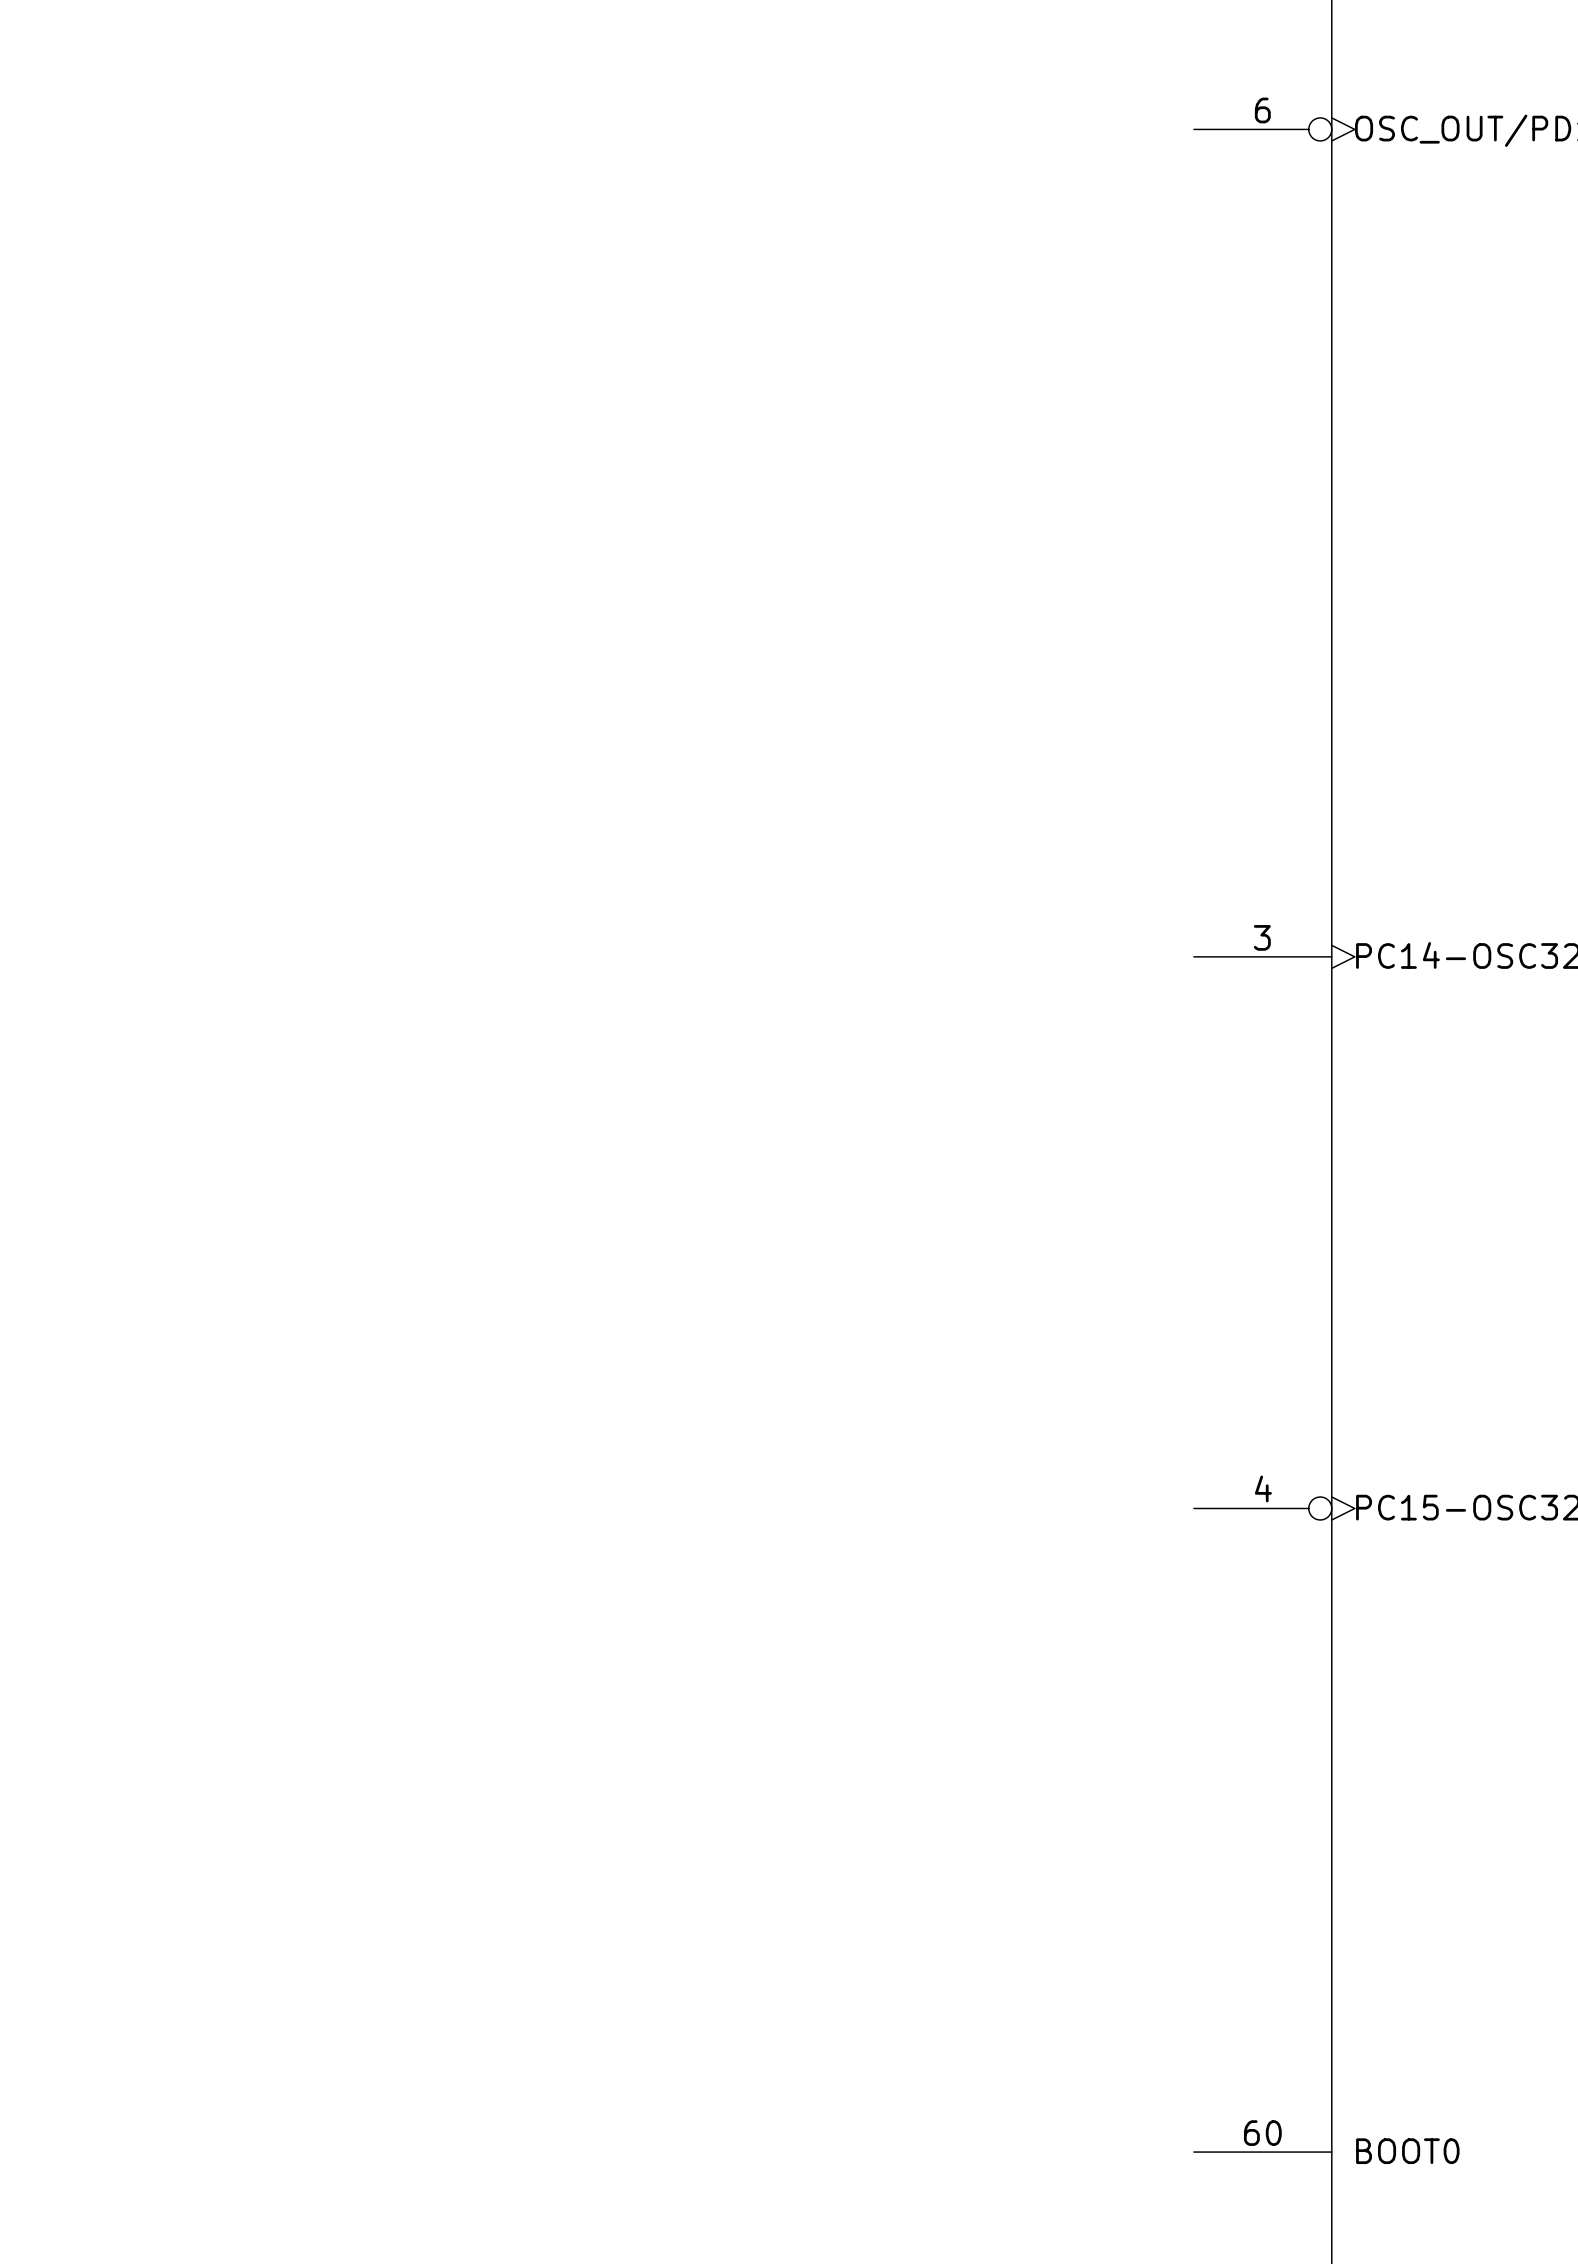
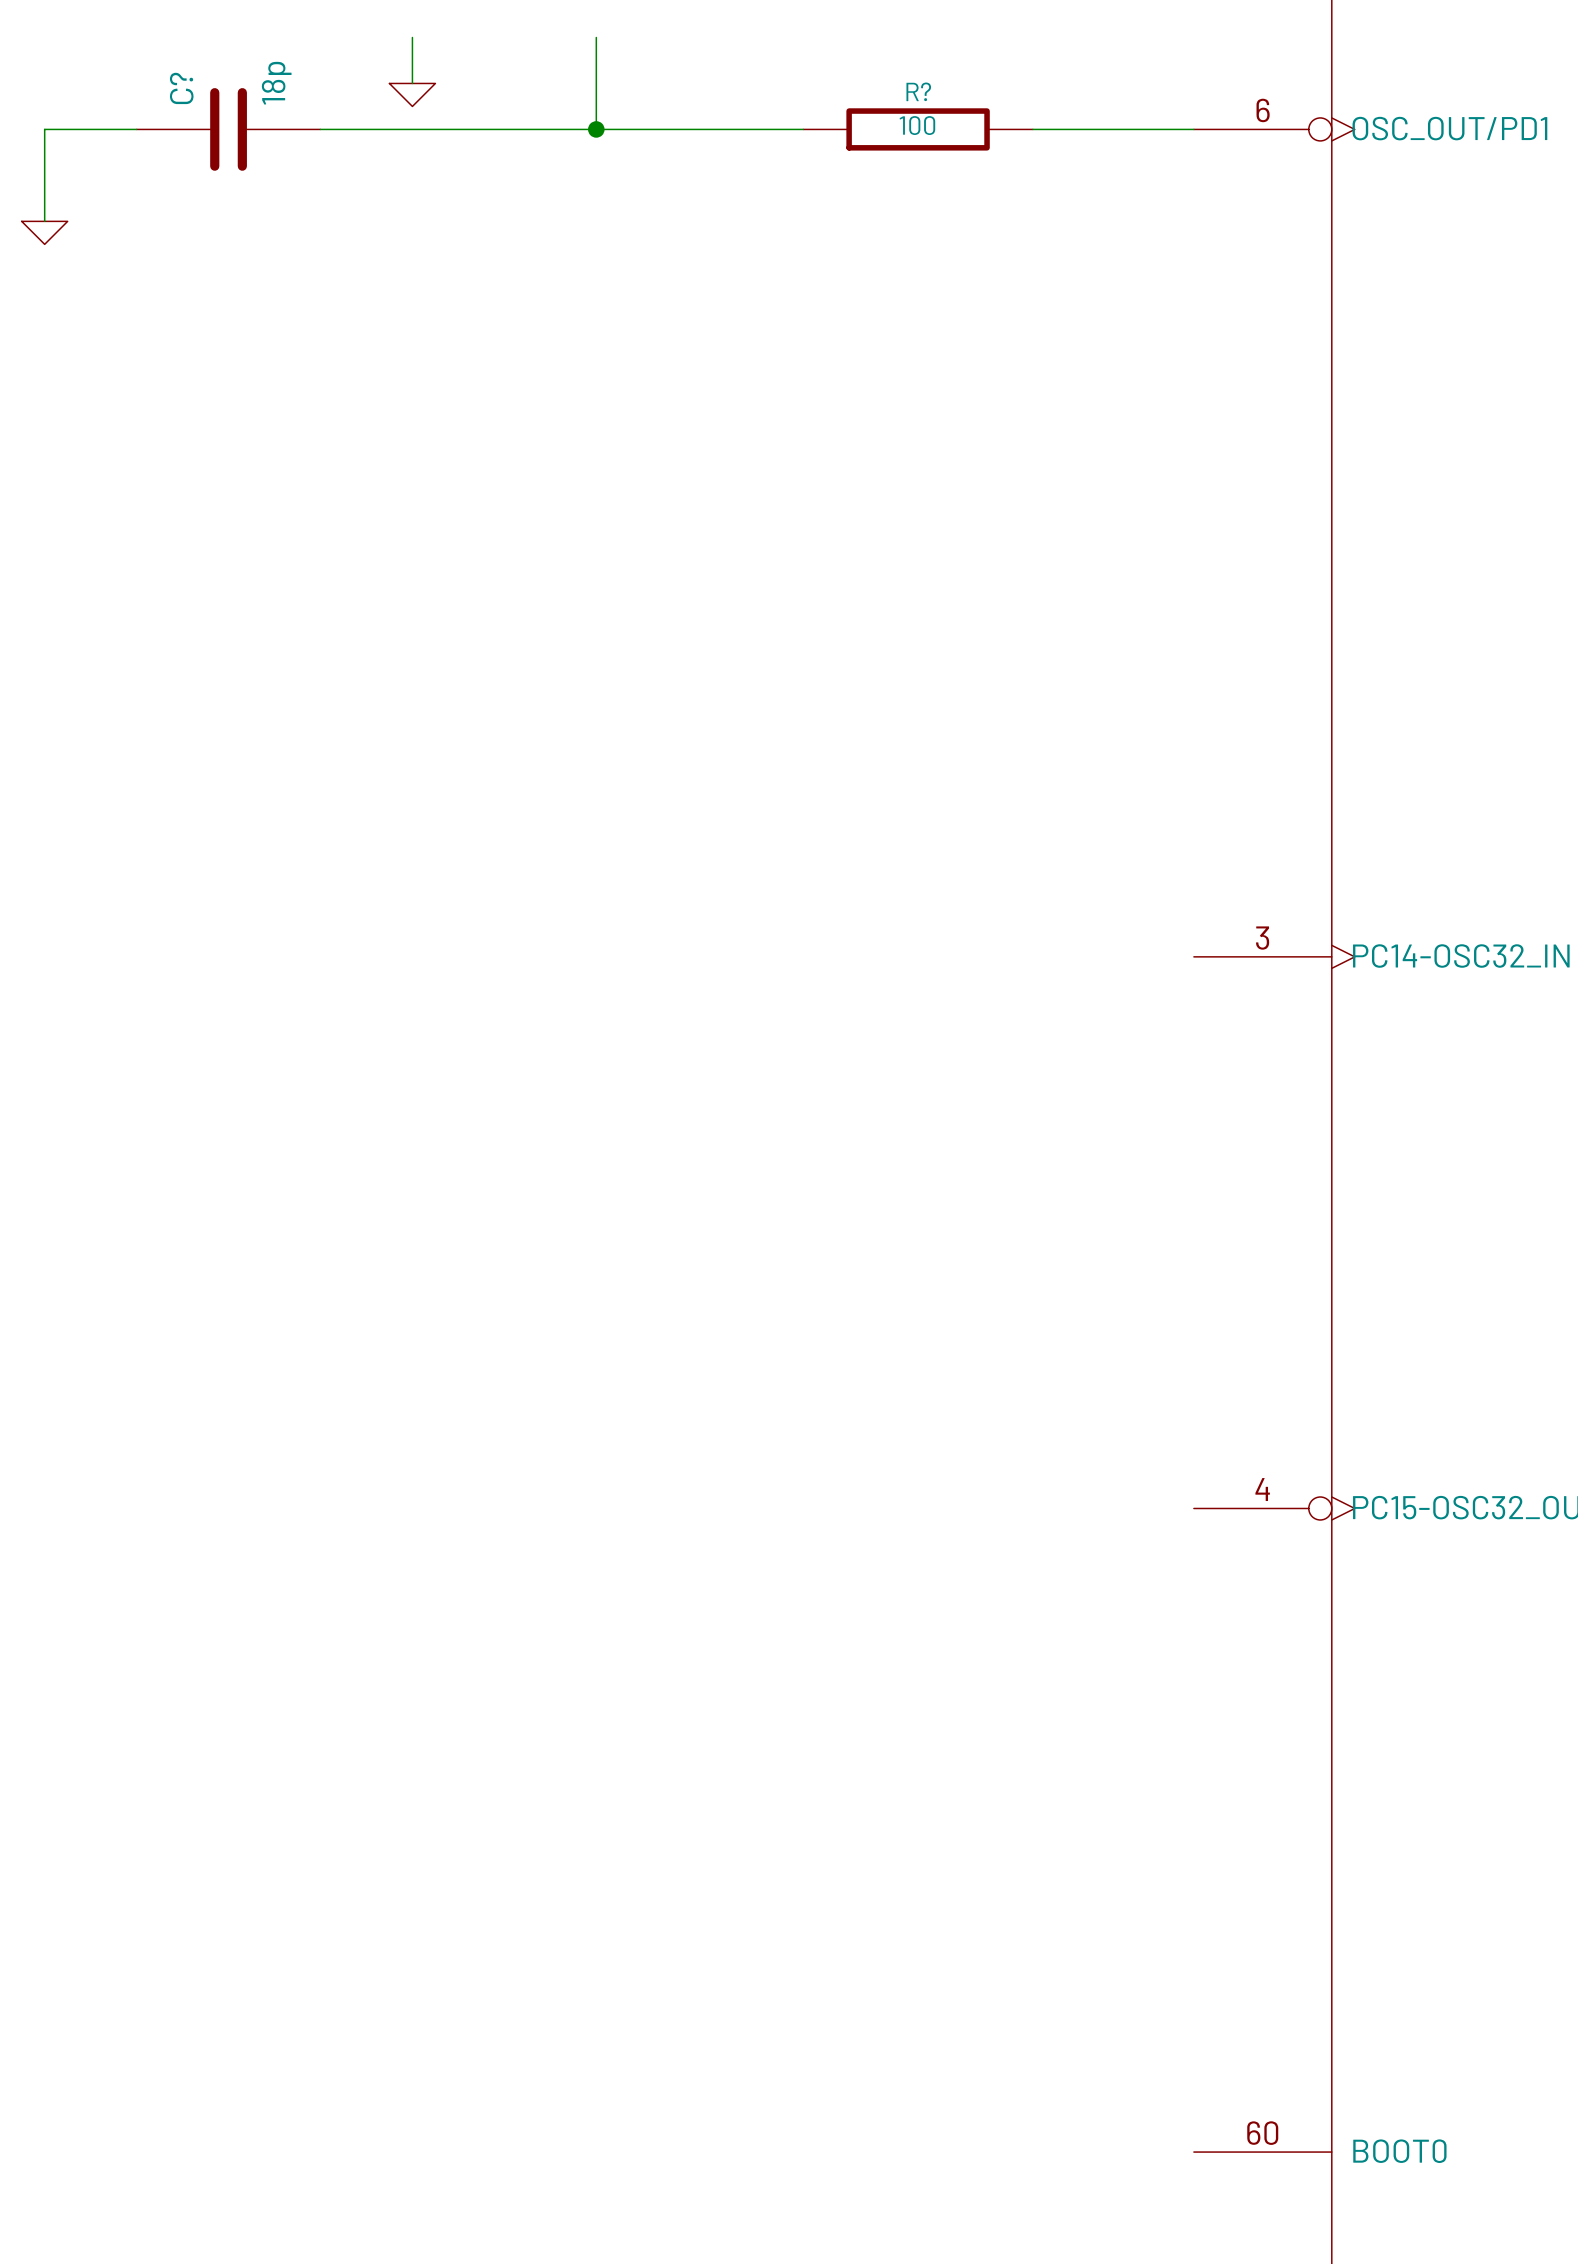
wire: none -> (412, 37) (412, 83)
wire: none -> (596, 37) (596, 129)
power symbol: none -> (412, 94)
wire: none -> (136, 129) (44, 129) (44, 221)
C?: none -> 18p (228, 129)
wire: none -> (320, 129) (803, 129)
junction: none -> (596, 129)
R?: none -> 100 (918, 129)
wire: none -> (1033, 129) (1193, 129)
power symbol: none -> (44, 232)

